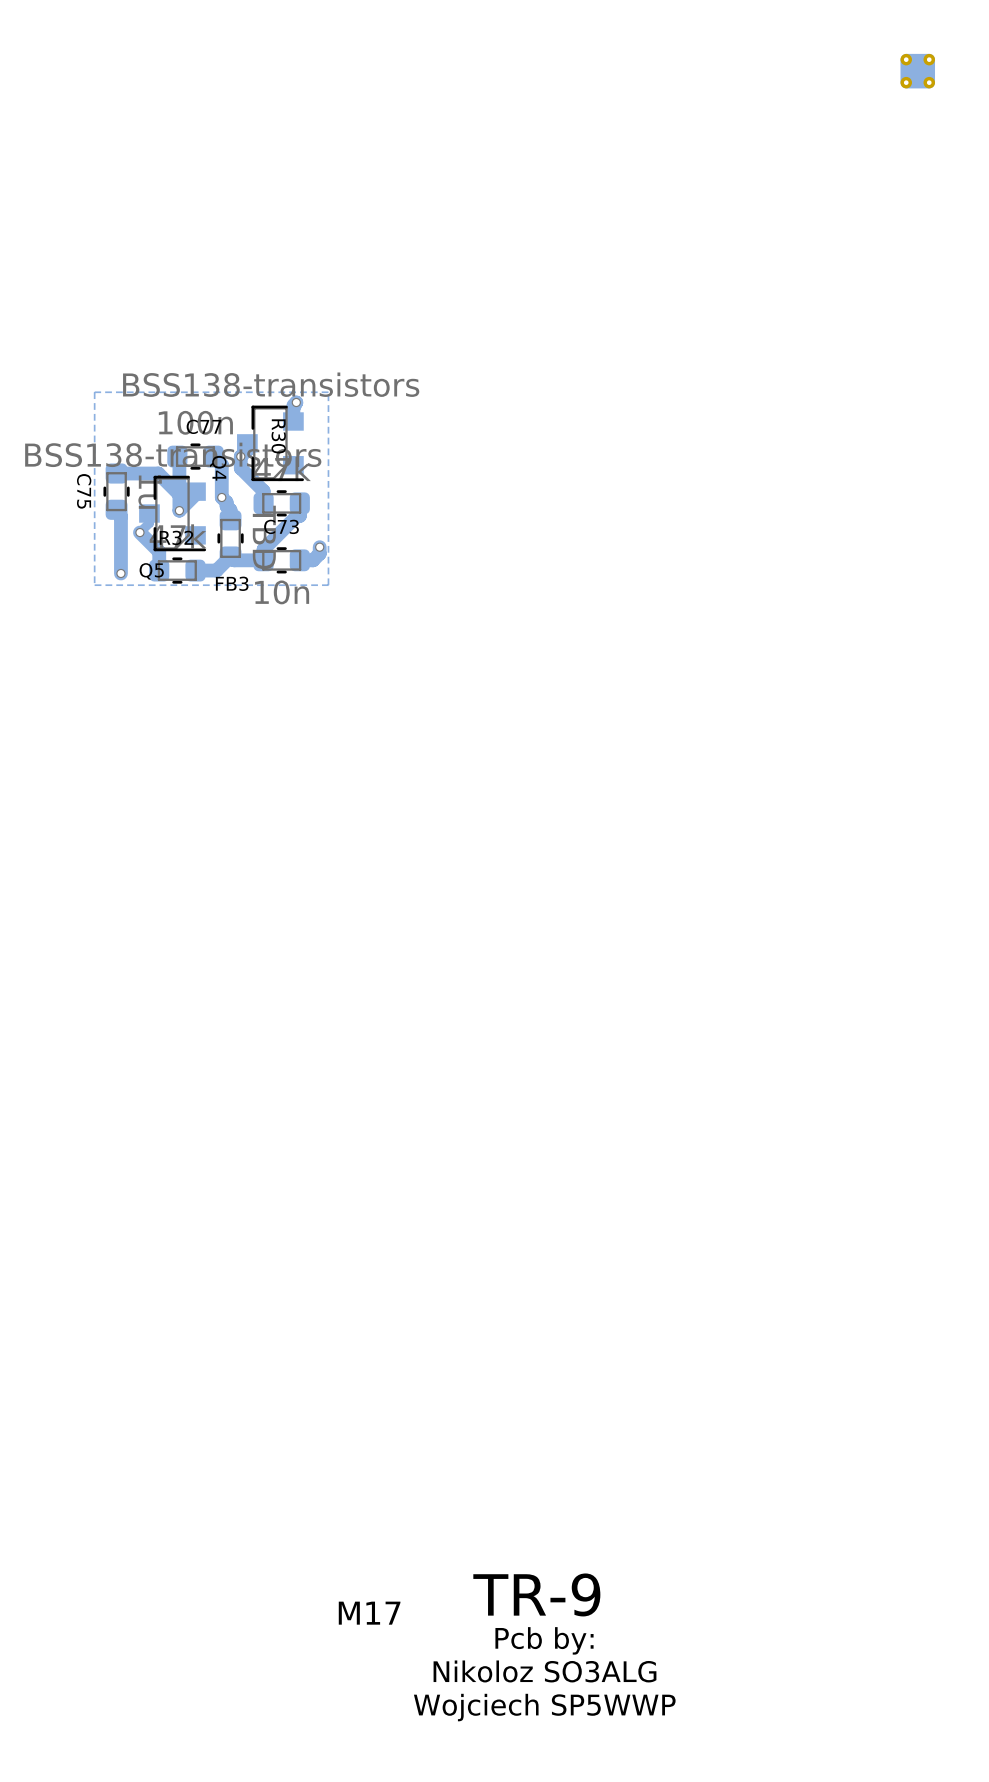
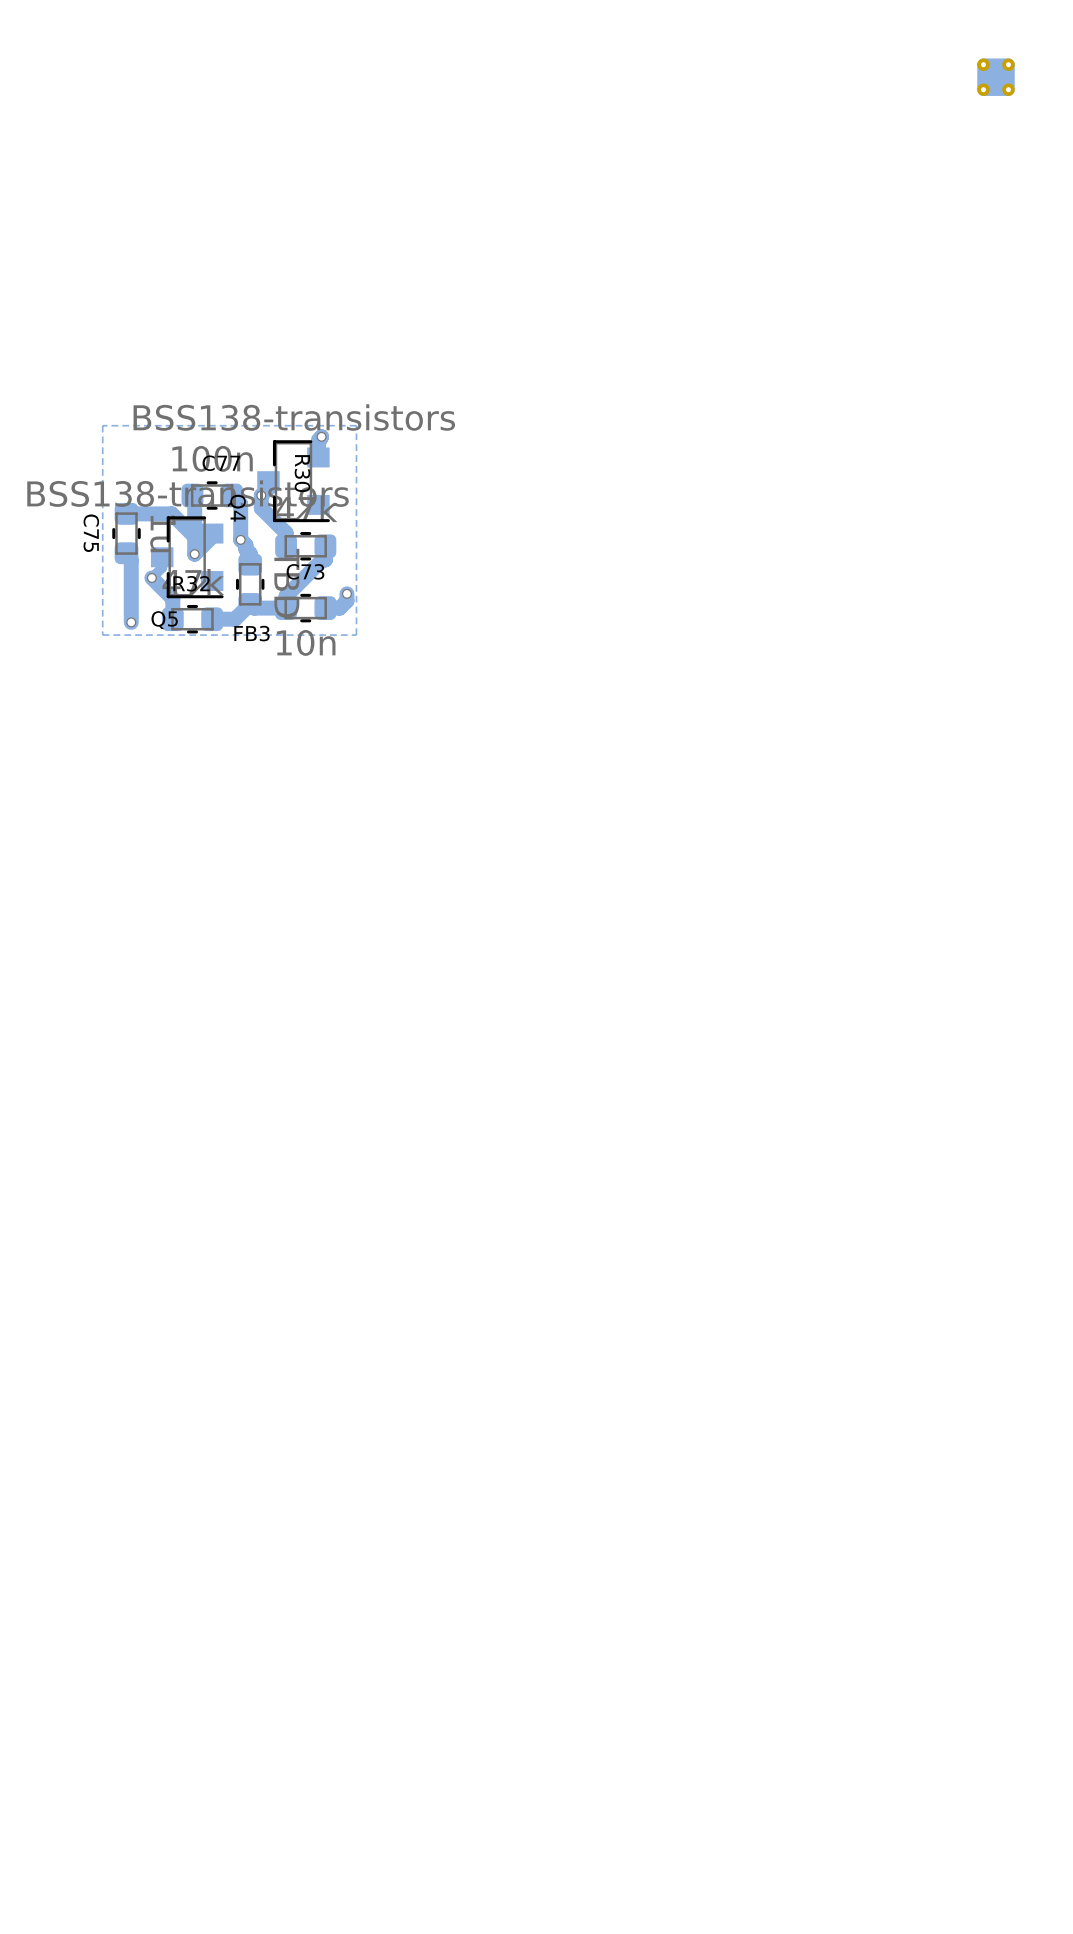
text: TR-9 (536, 1594) -> none
text: M17 (369, 1613) -> none
text: Pcb by: (544, 1640) -> none
text: Nikoloz SO3ALG (544, 1671) -> none
text: Wojciech SP5WWP (544, 1707) -> none

